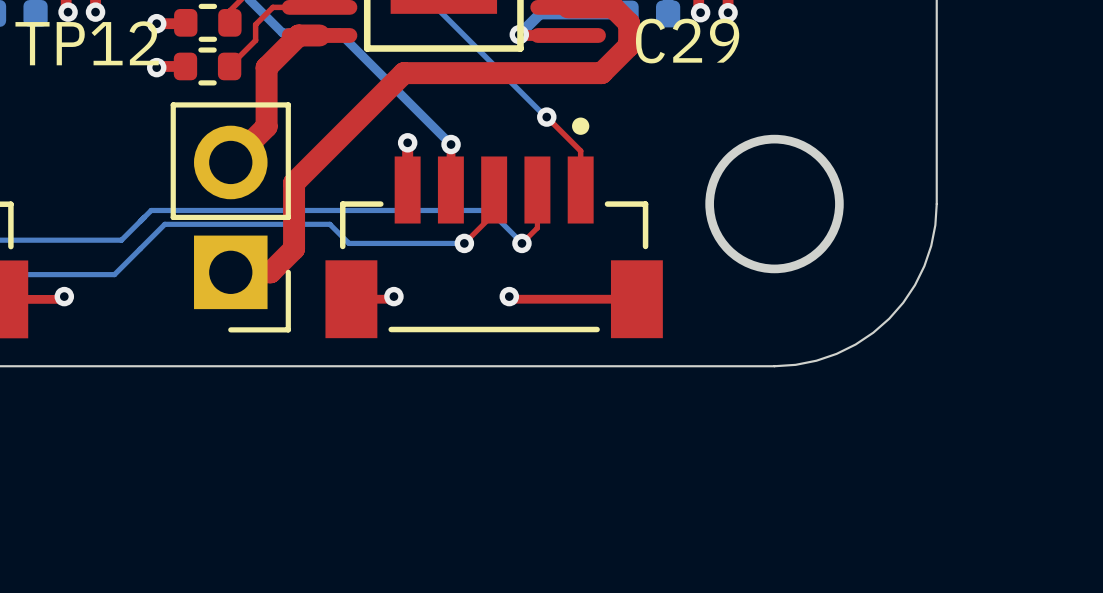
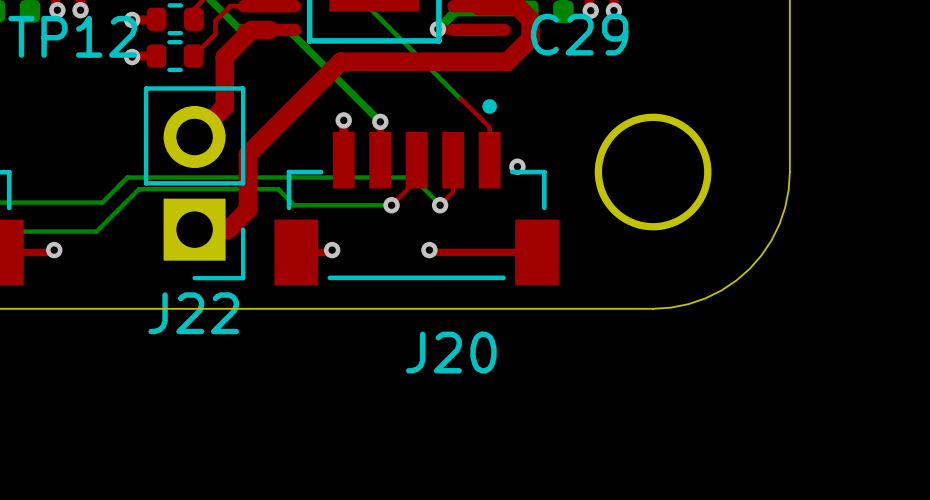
via position: (546, 117) -> (517, 166)
J22 name: none -> J22 (193, 313)
J20 name: none -> J20 (451, 352)

